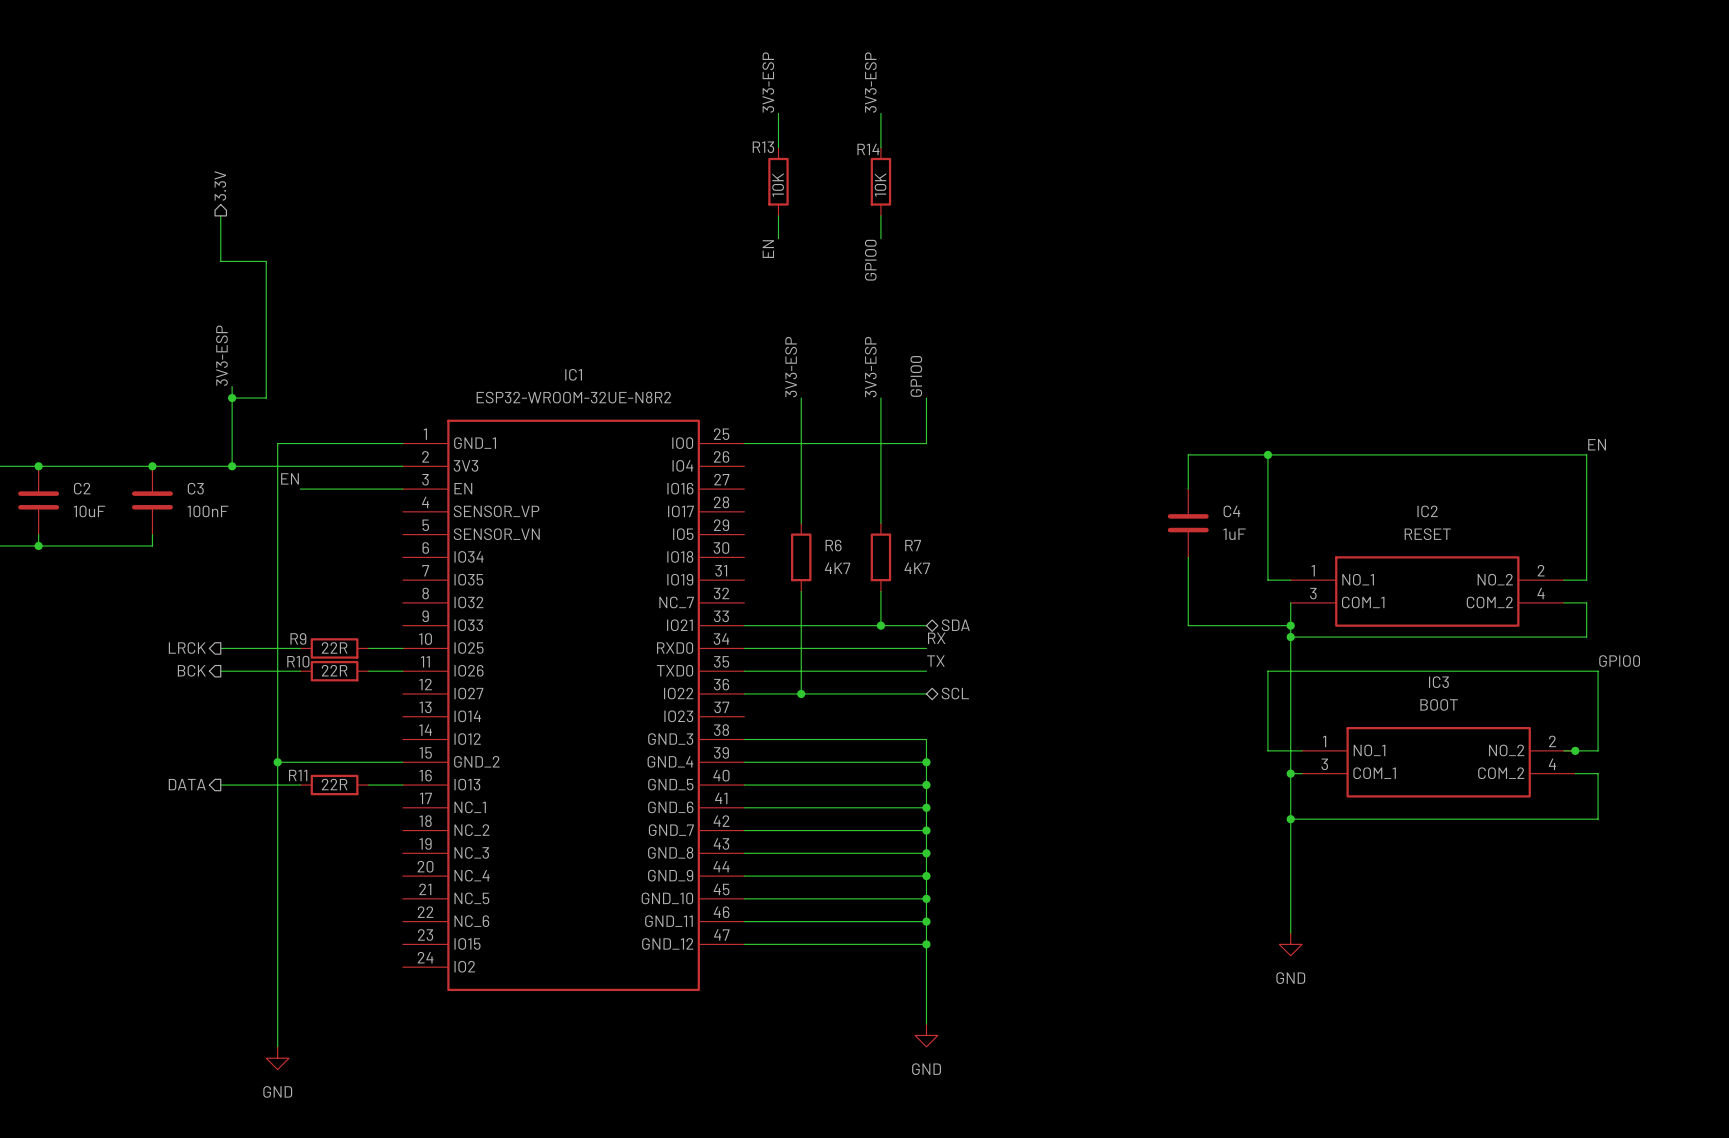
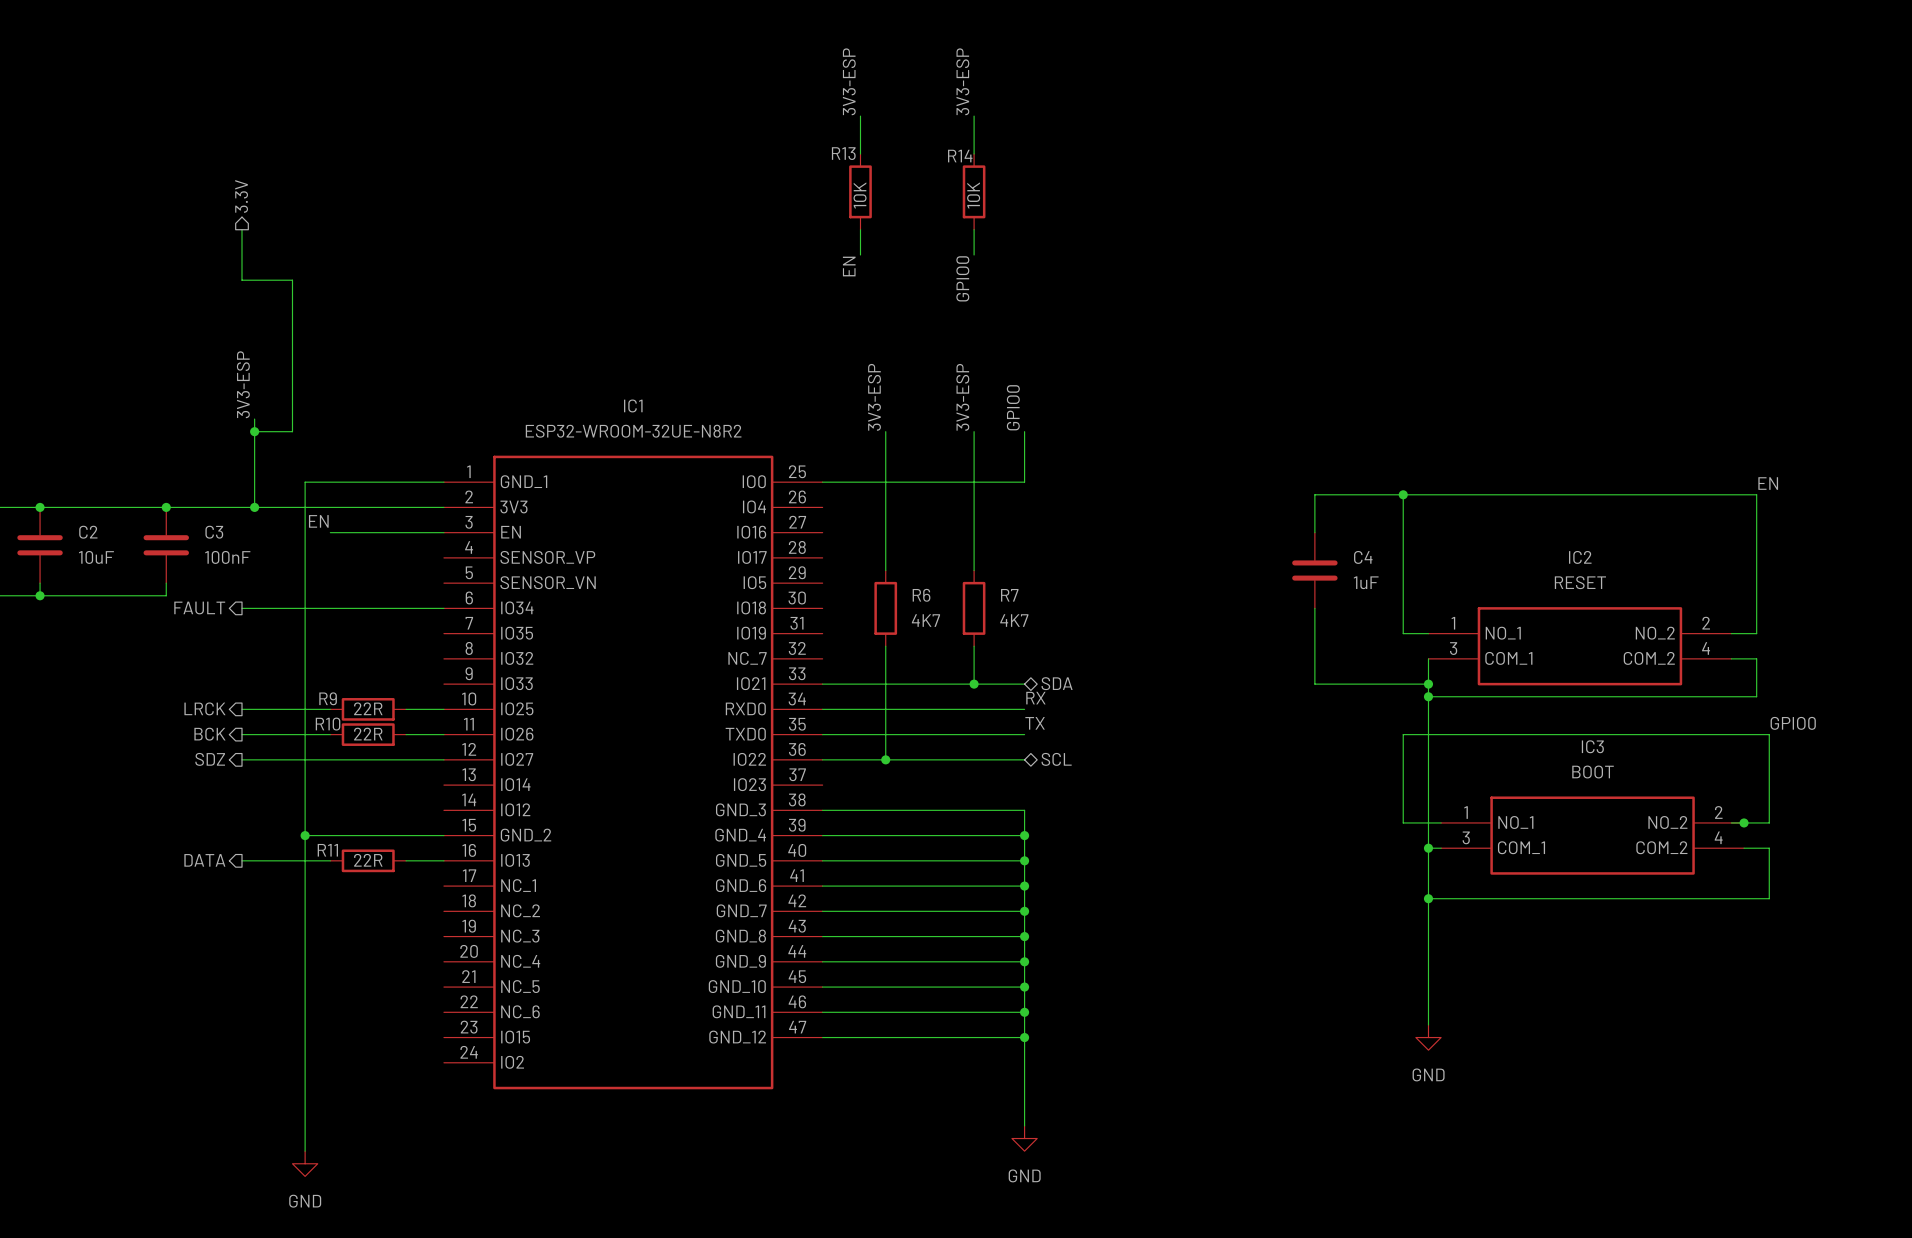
hierarchical label: none -> FAULT (199, 607)
wire: none -> (242, 608) (443, 608)
hierarchical label: none -> SDZ (210, 759)
wire: none -> (242, 759) (443, 759)

